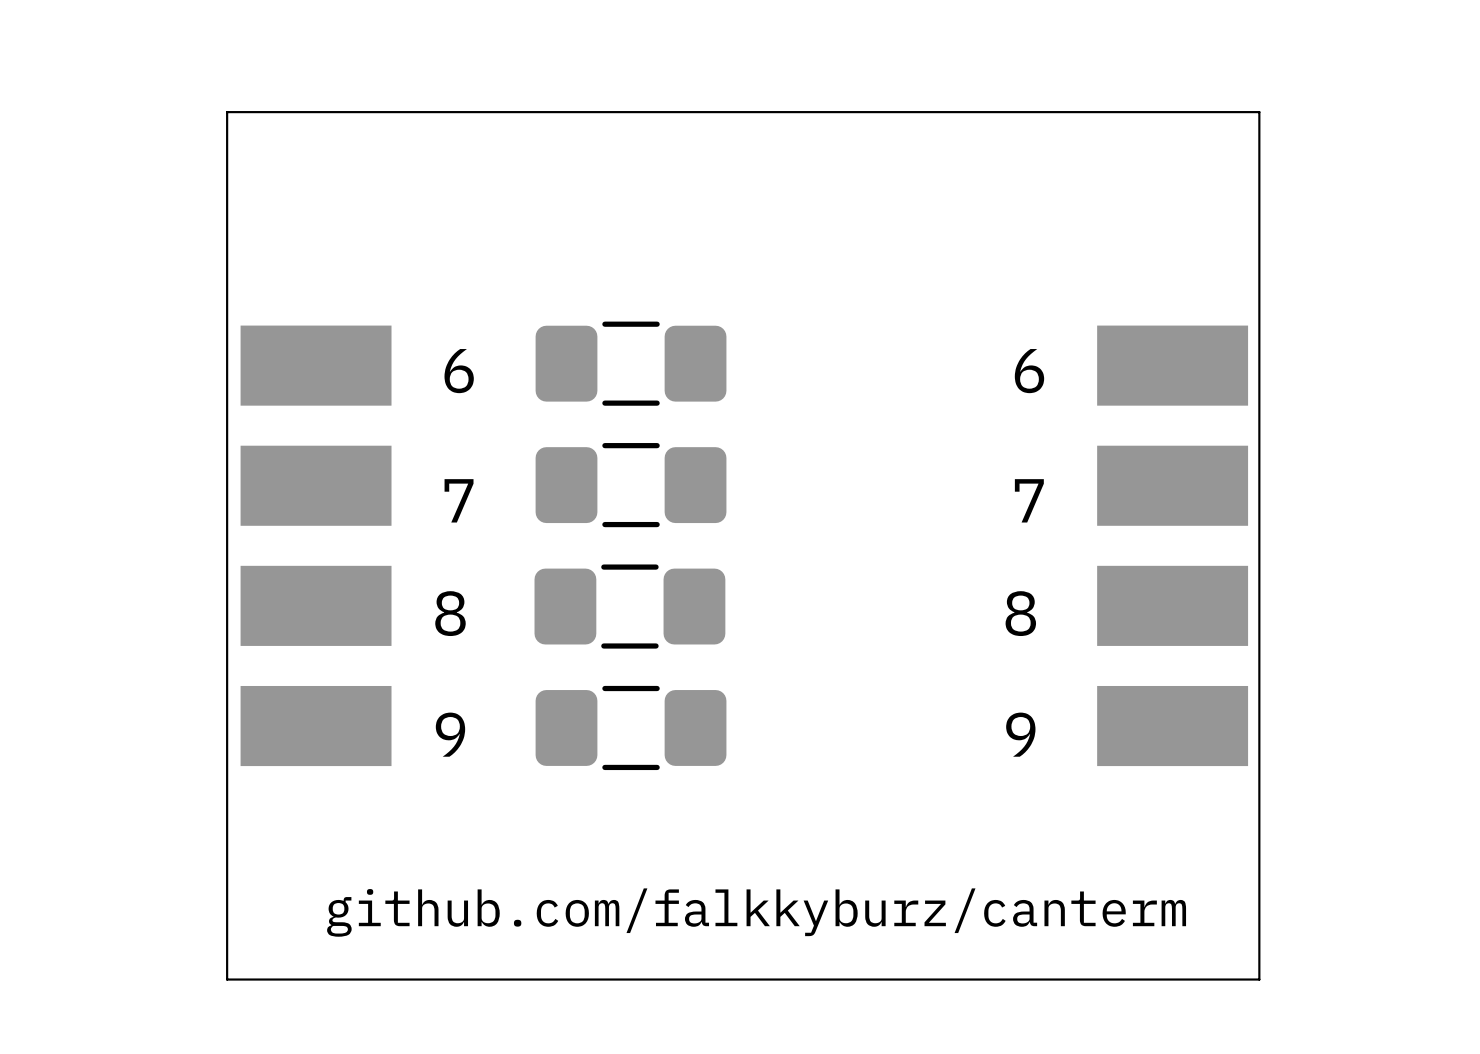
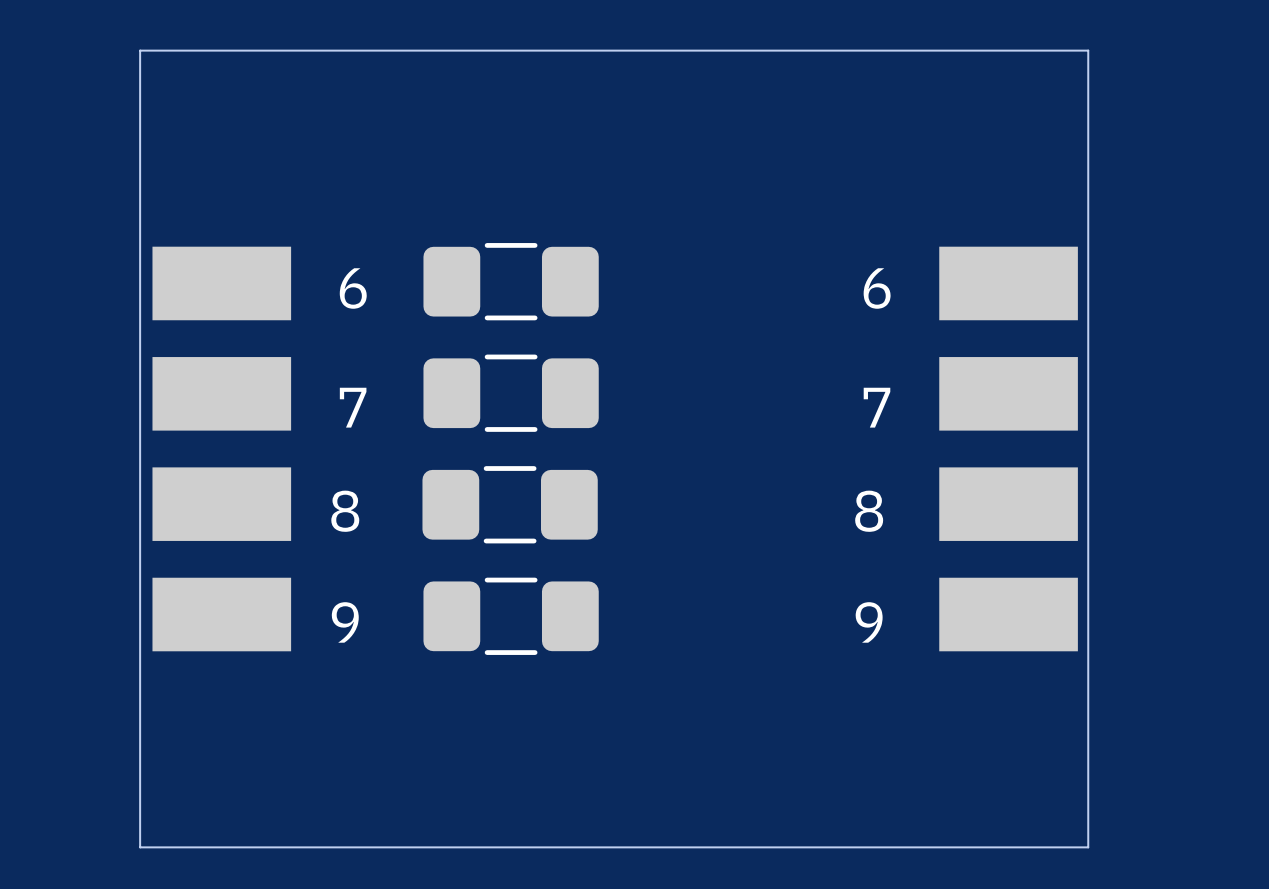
text: github.com/falkkyburz/canterm (756, 912) -> none

